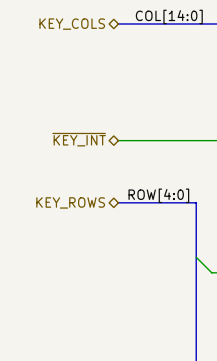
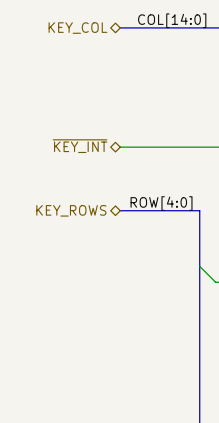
hierarchical label: KEY_COLS (72, 24) -> KEY_COL (77, 28)

